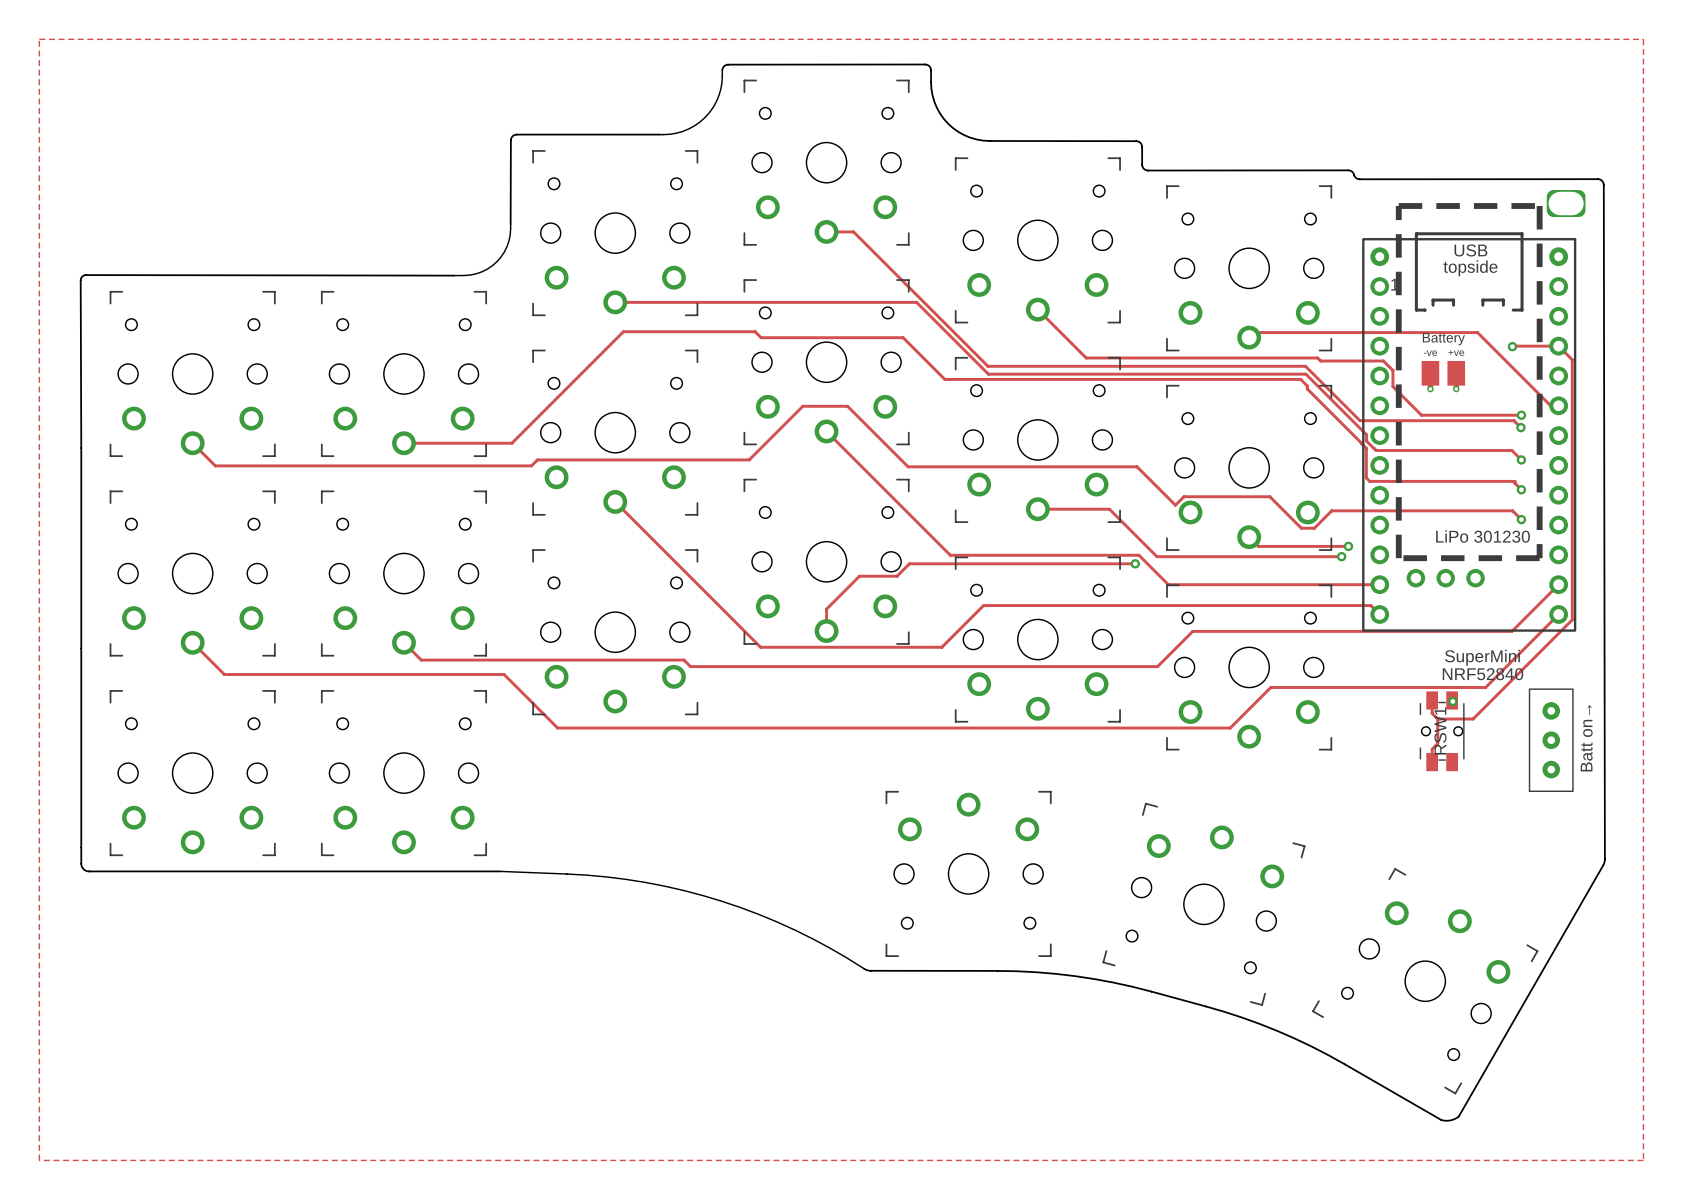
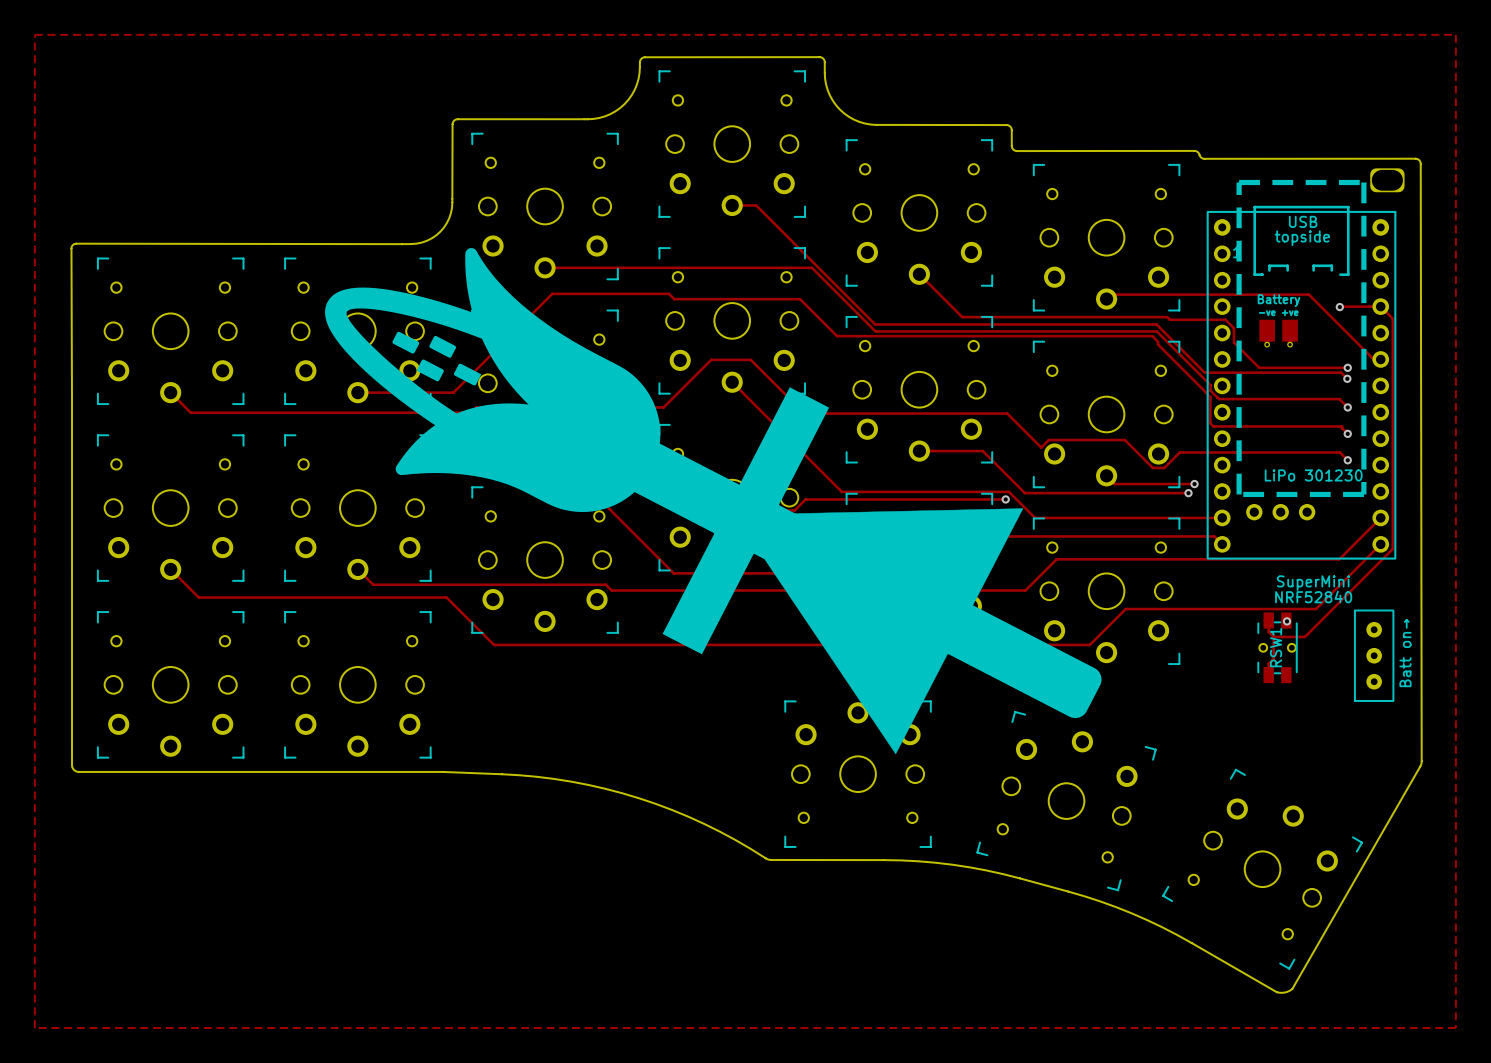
drawing: none -> [325, 248, 1102, 755]

